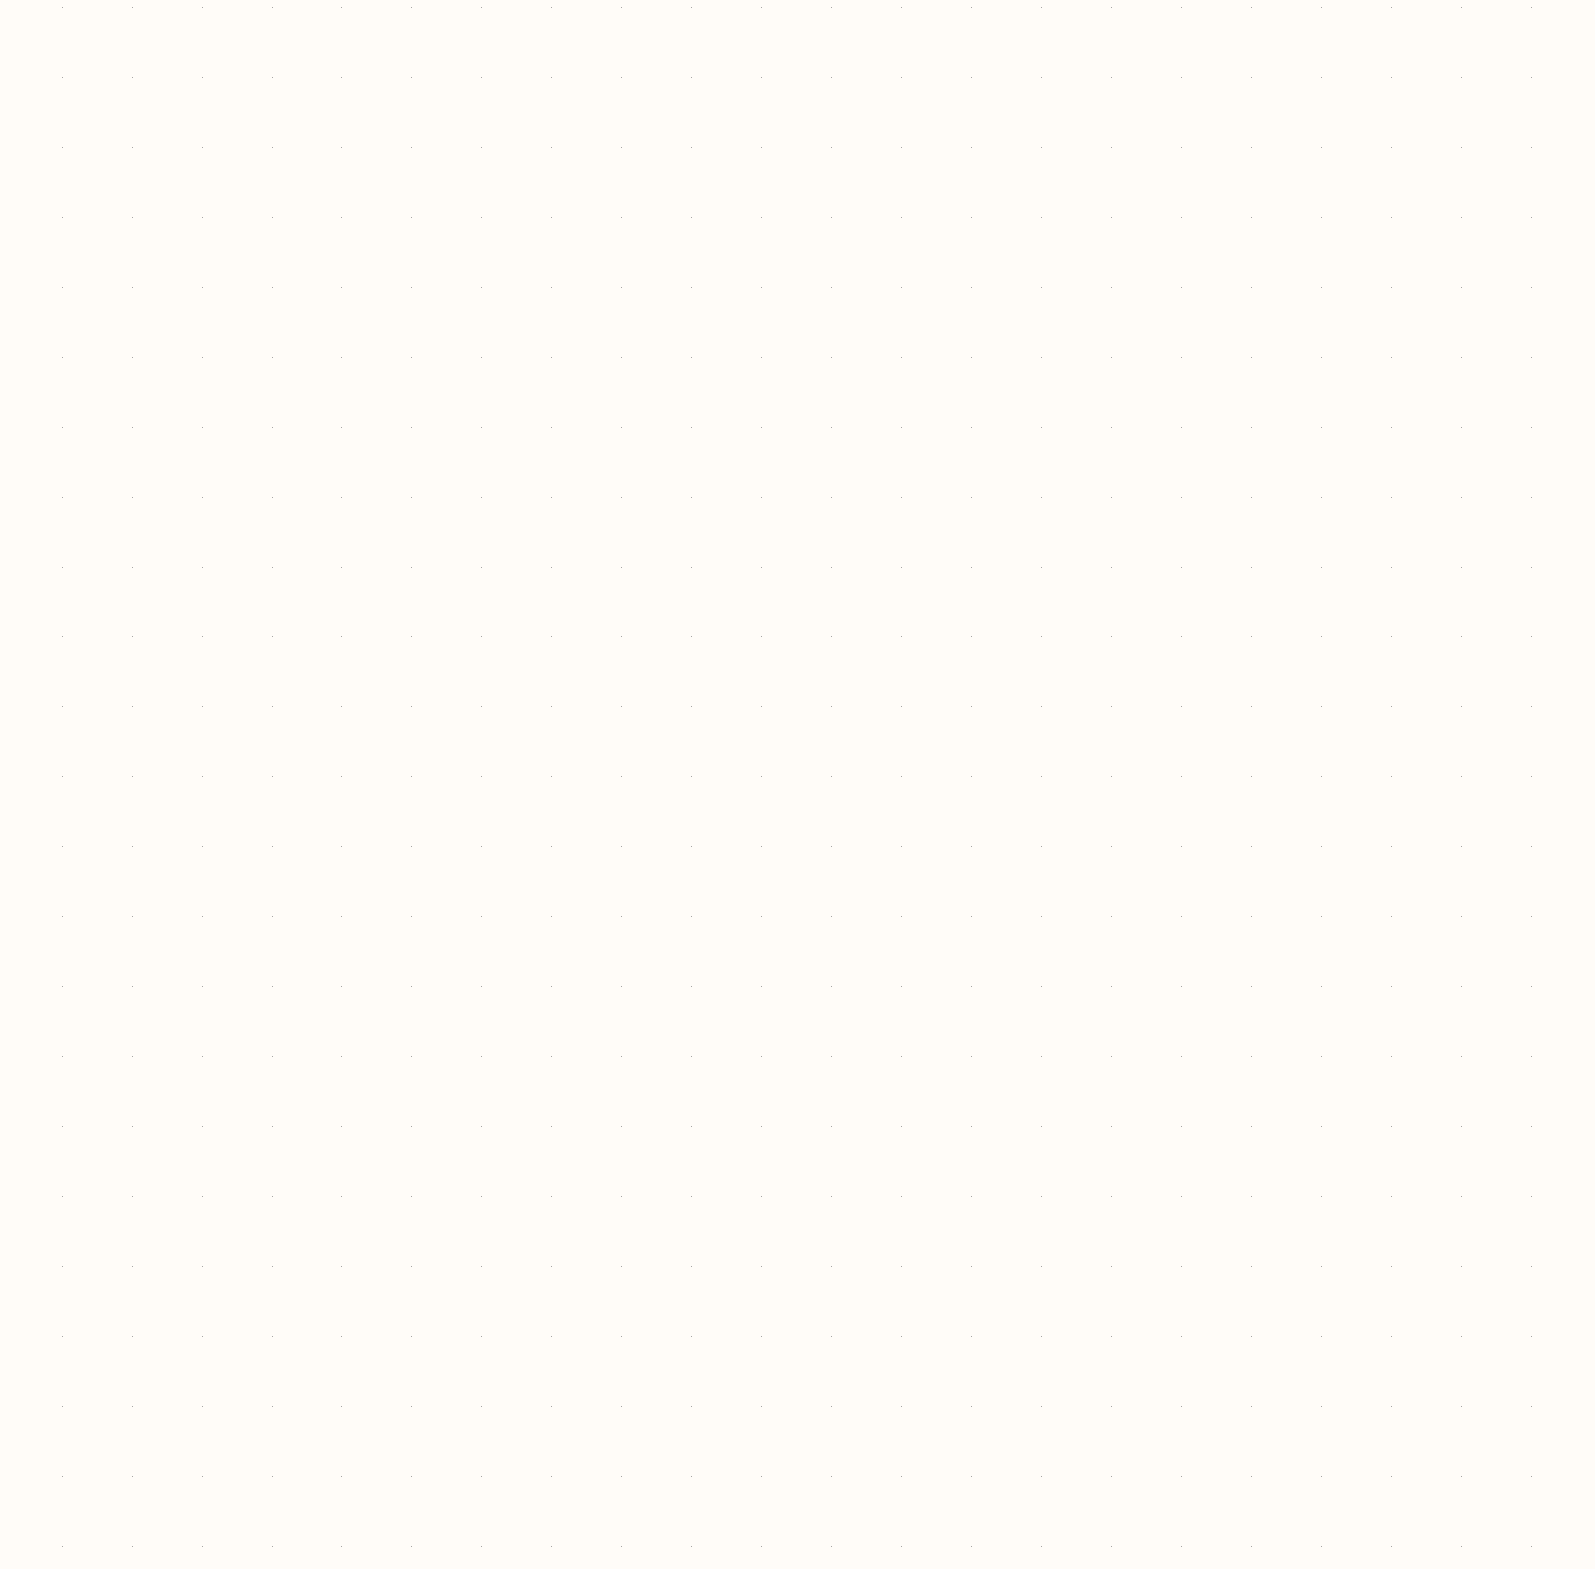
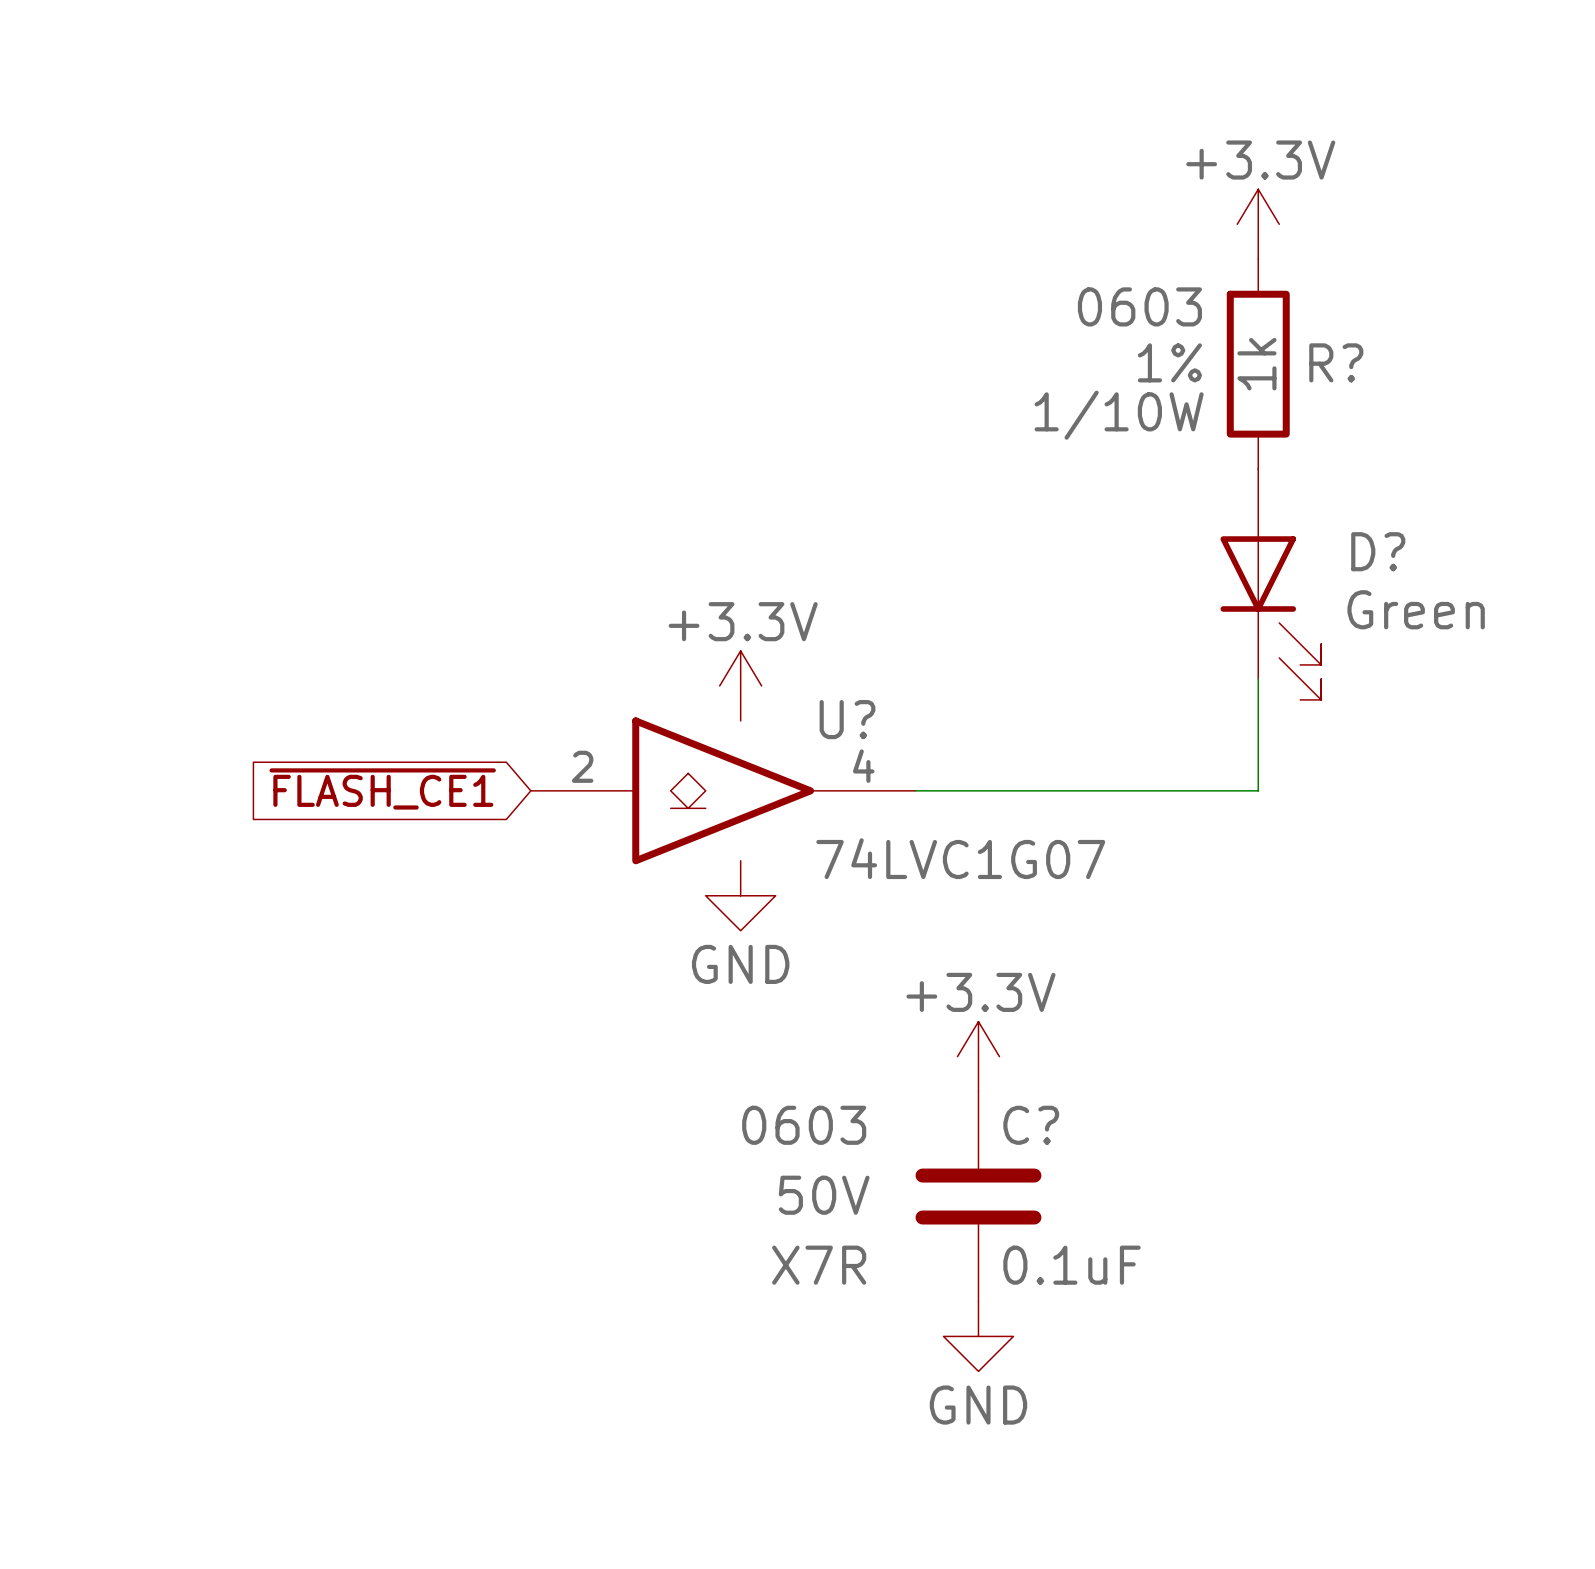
power symbol: none -> +3.3V (1258, 224)
R?: none -> 1k (1258, 364)
D?: none -> Green (1270, 584)
wire: none -> (1258, 678) (1258, 790) (915, 790)
power symbol: none -> +3.3V (740, 685)
global label: none -> ~{FLASH_CE1} (382, 788)
U?: none -> 74LVC1G07 (723, 790)
power symbol: none -> GND (740, 895)
power symbol: none -> +3.3V (978, 1056)
C?: none -> 0.1uF (978, 1196)
power symbol: none -> GND (978, 1336)

